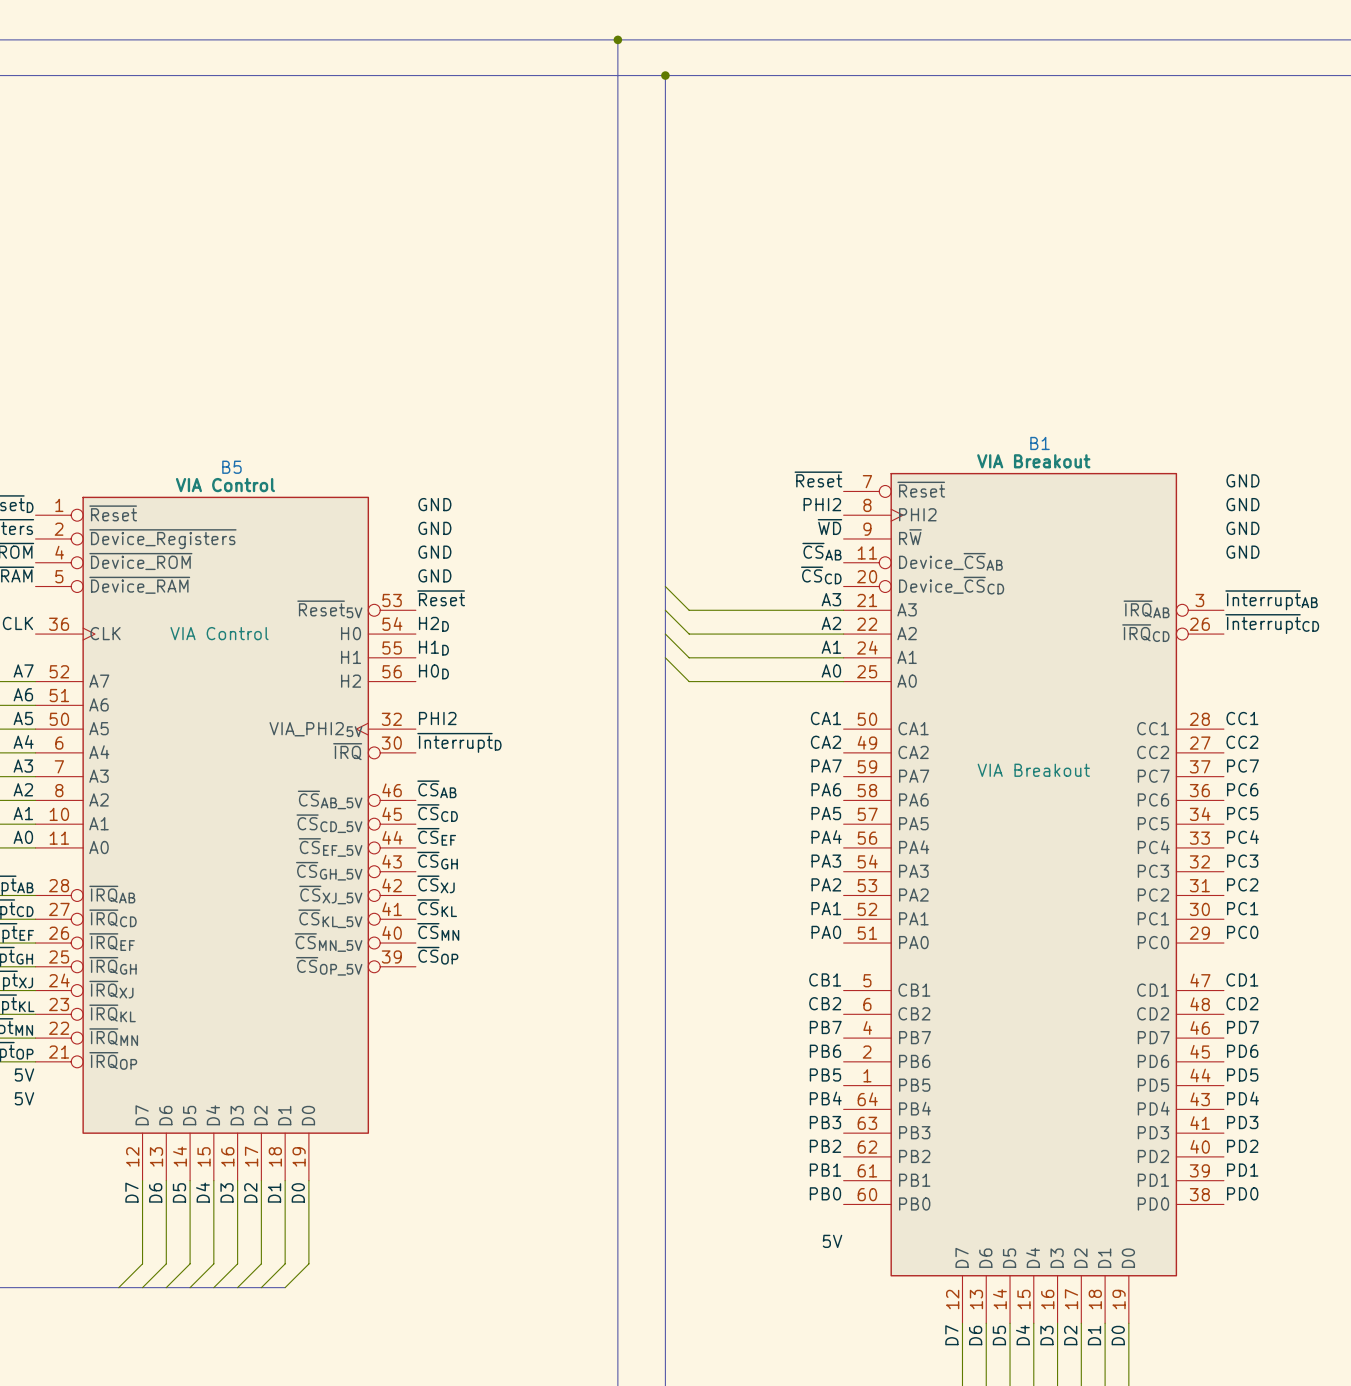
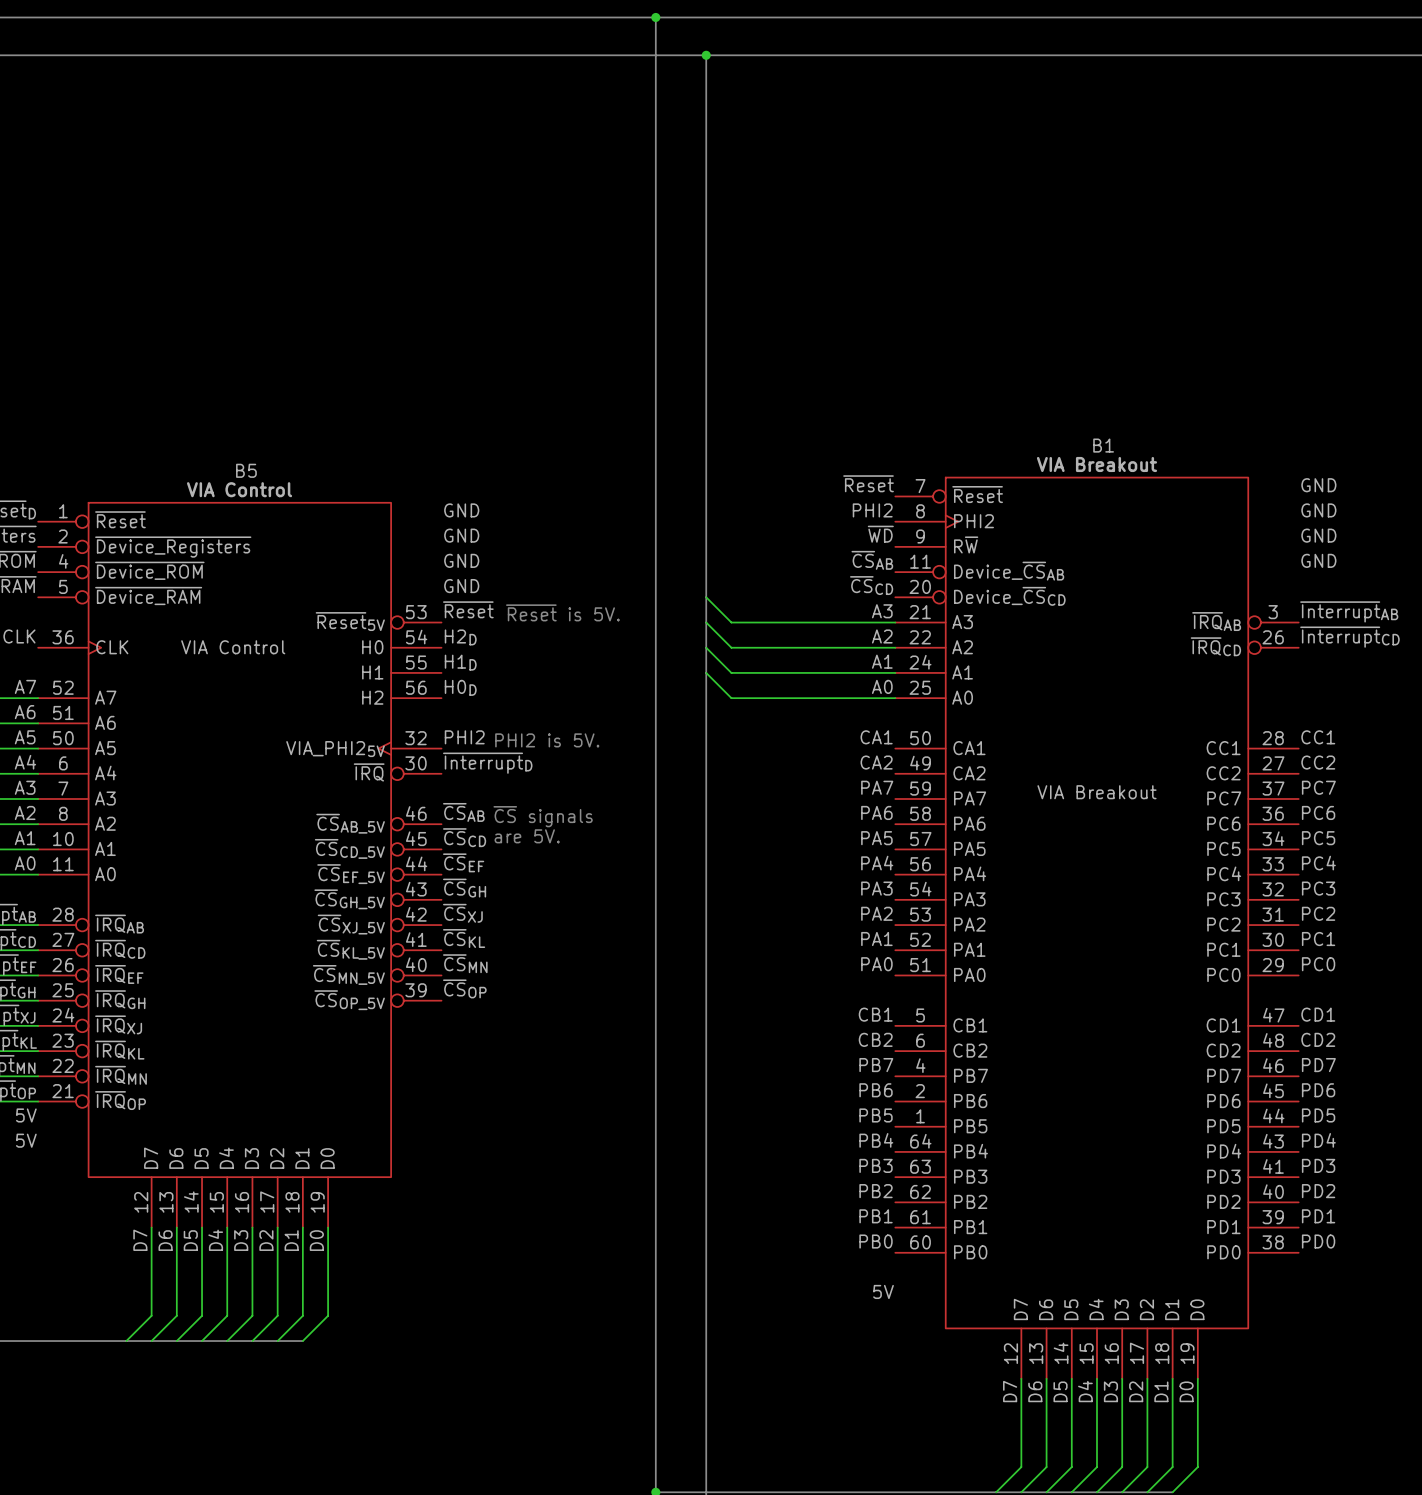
text: none -> ~{Reset} is 5V. (562, 612)
text: none -> PHI2 is 5V. (547, 740)
text: none -> ~{CS} signals (543, 816)
text: none -> are 5V. (527, 836)

